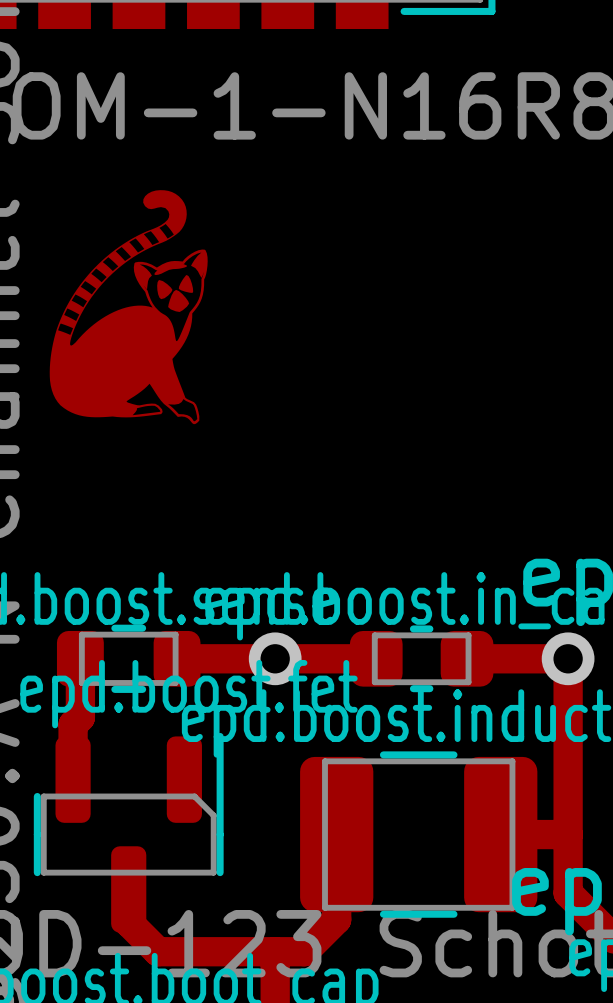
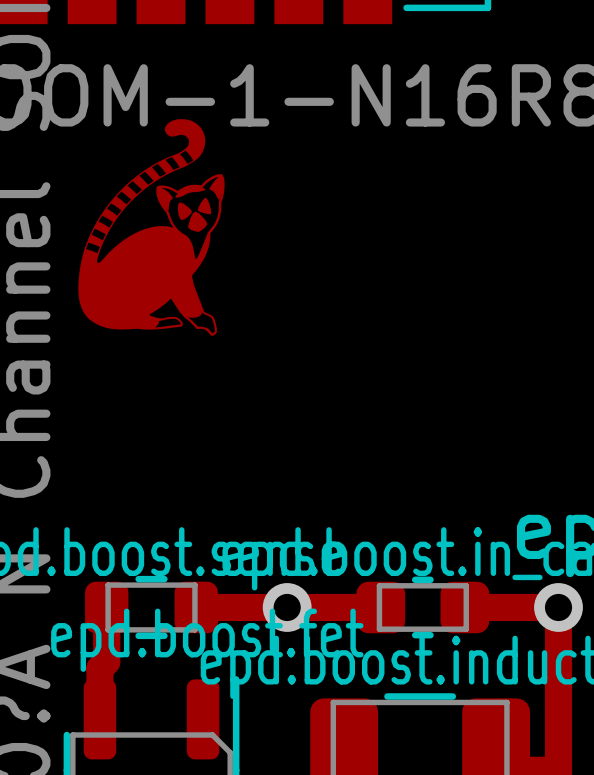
part position: (128, 307) -> (151, 227)

